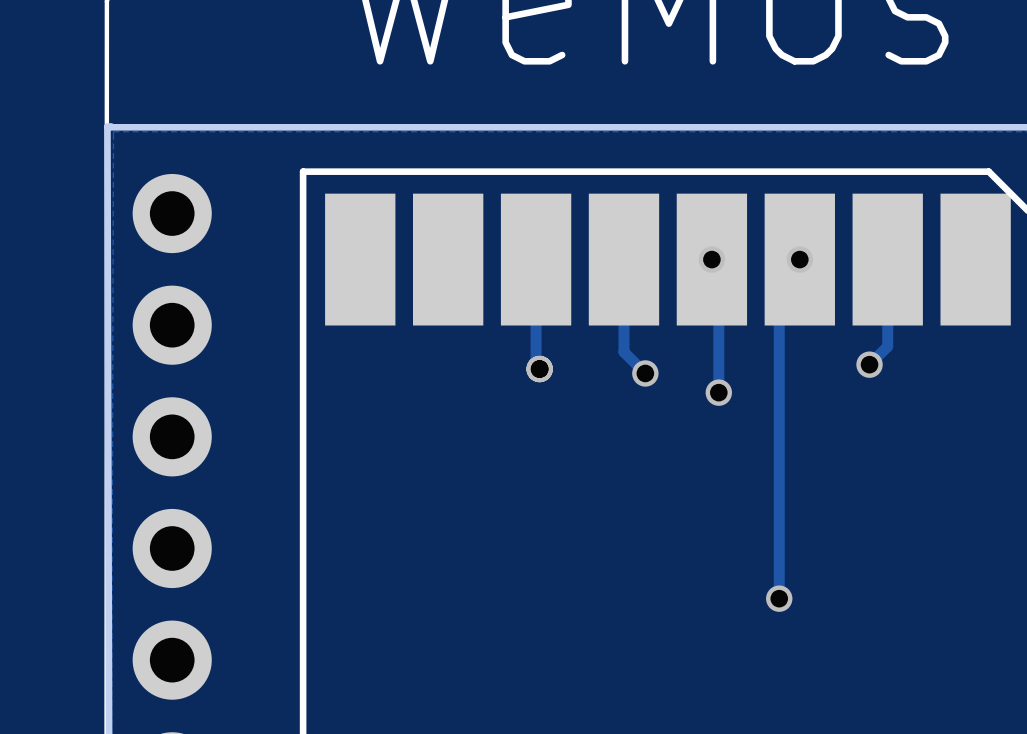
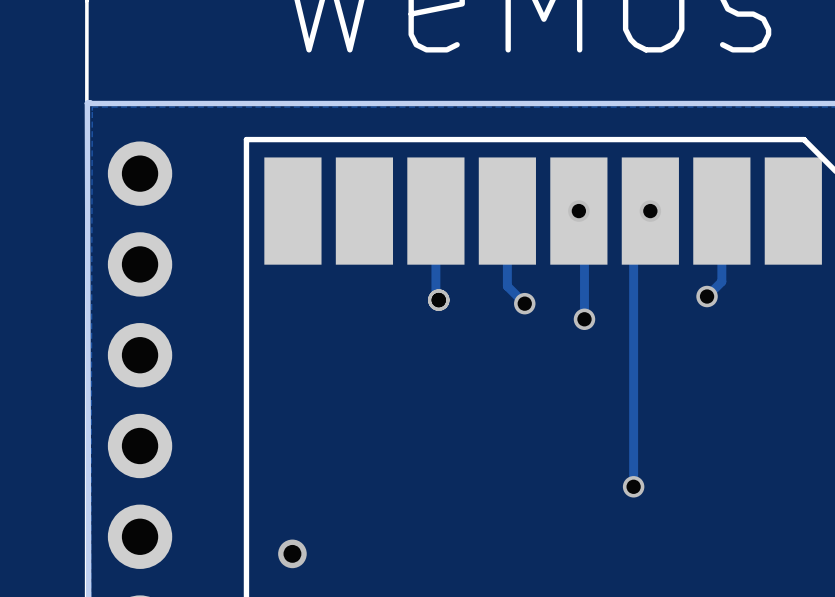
via: none -> (292, 553)

